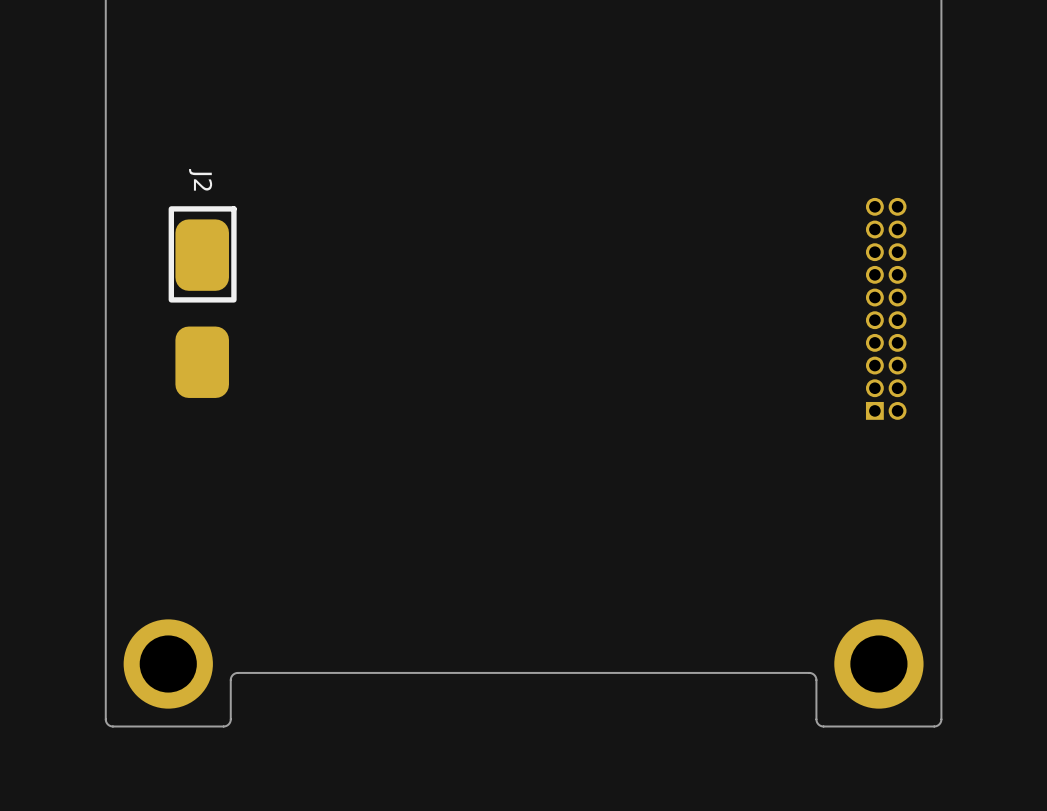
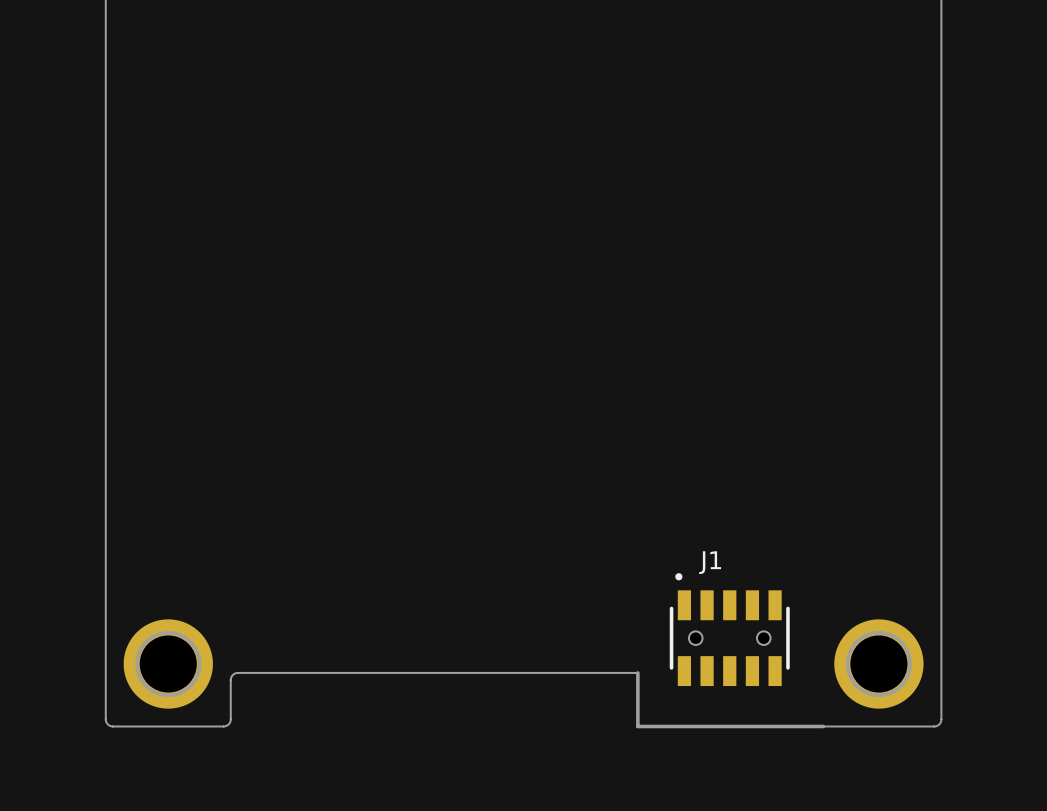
J2: (202, 302) -> none
part: (886, 308) -> none
J1: none -> (729, 629)
round board edge: none -> [135, 630, 202, 698]
round board edge: none -> [845, 630, 912, 698]
board edge: (637, 672) (811, 673) (816, 679) (816, 720) (819, 724) (823, 726) -> (637, 672) (637, 726) (823, 726)

